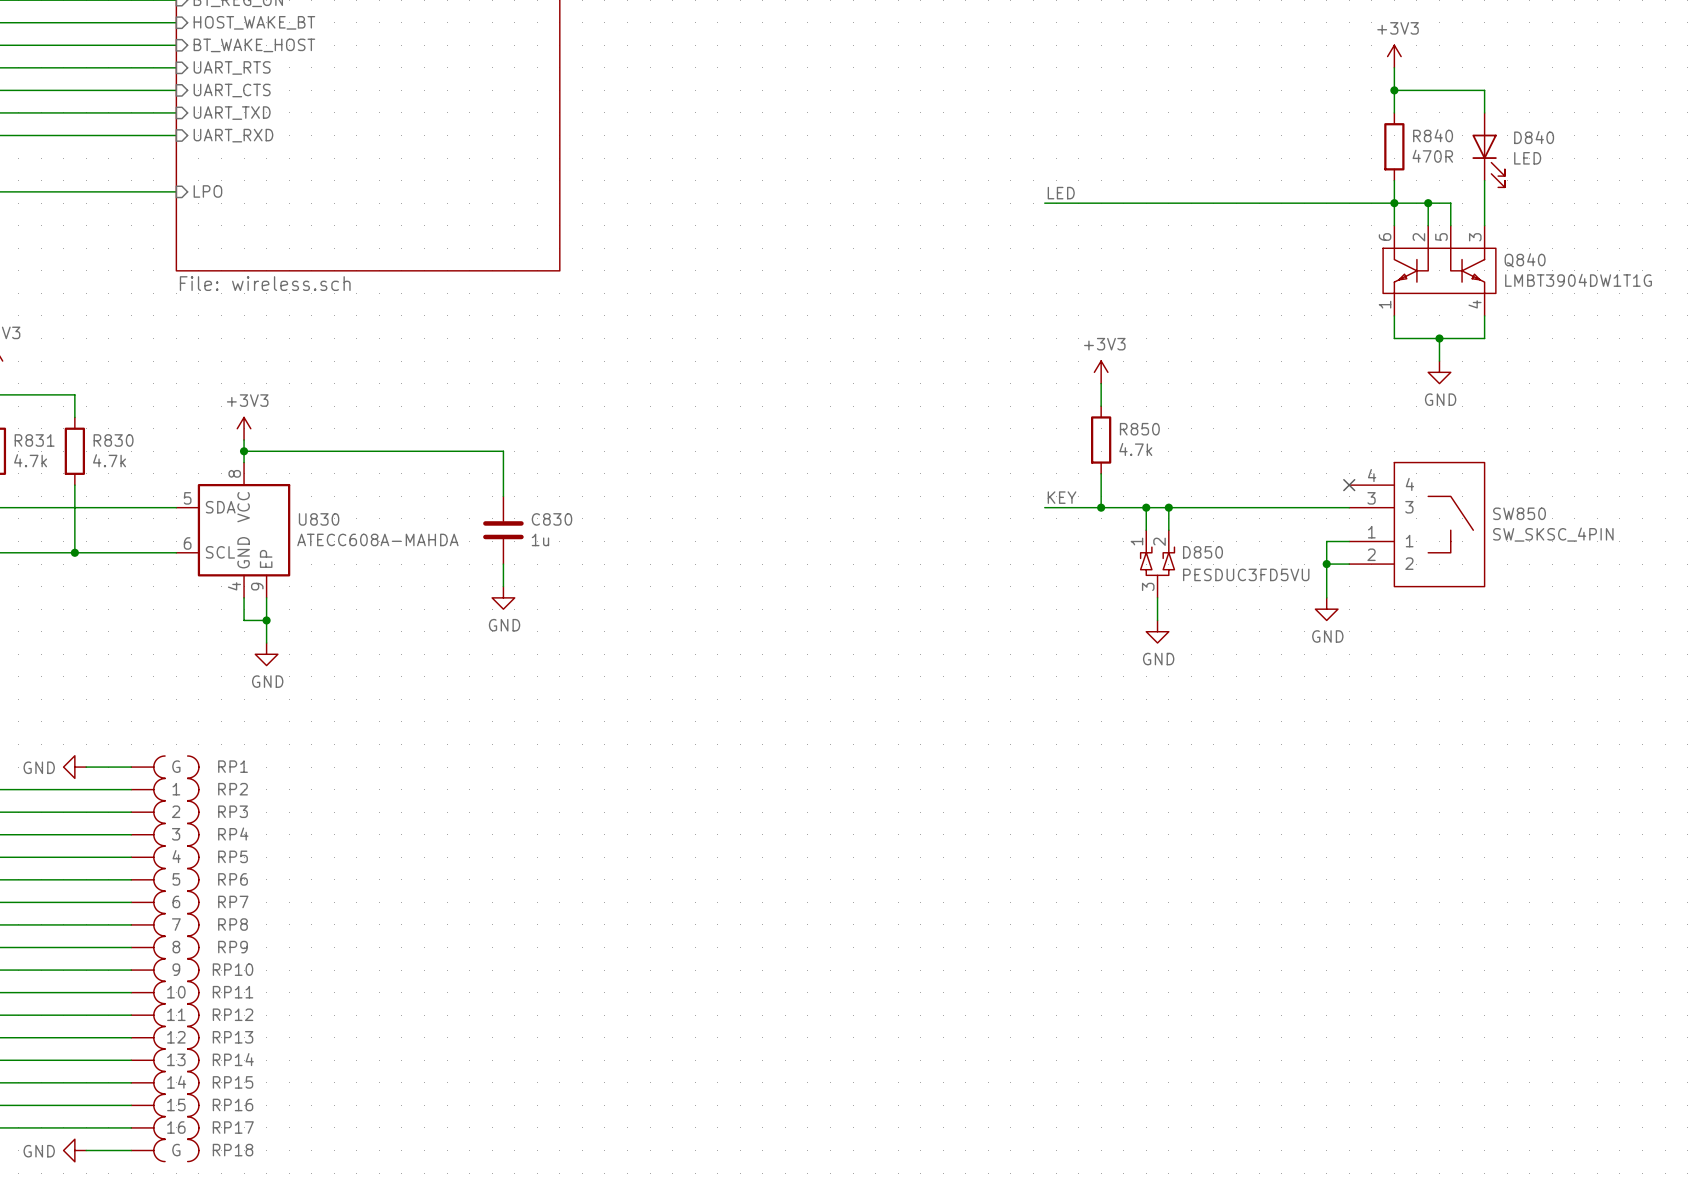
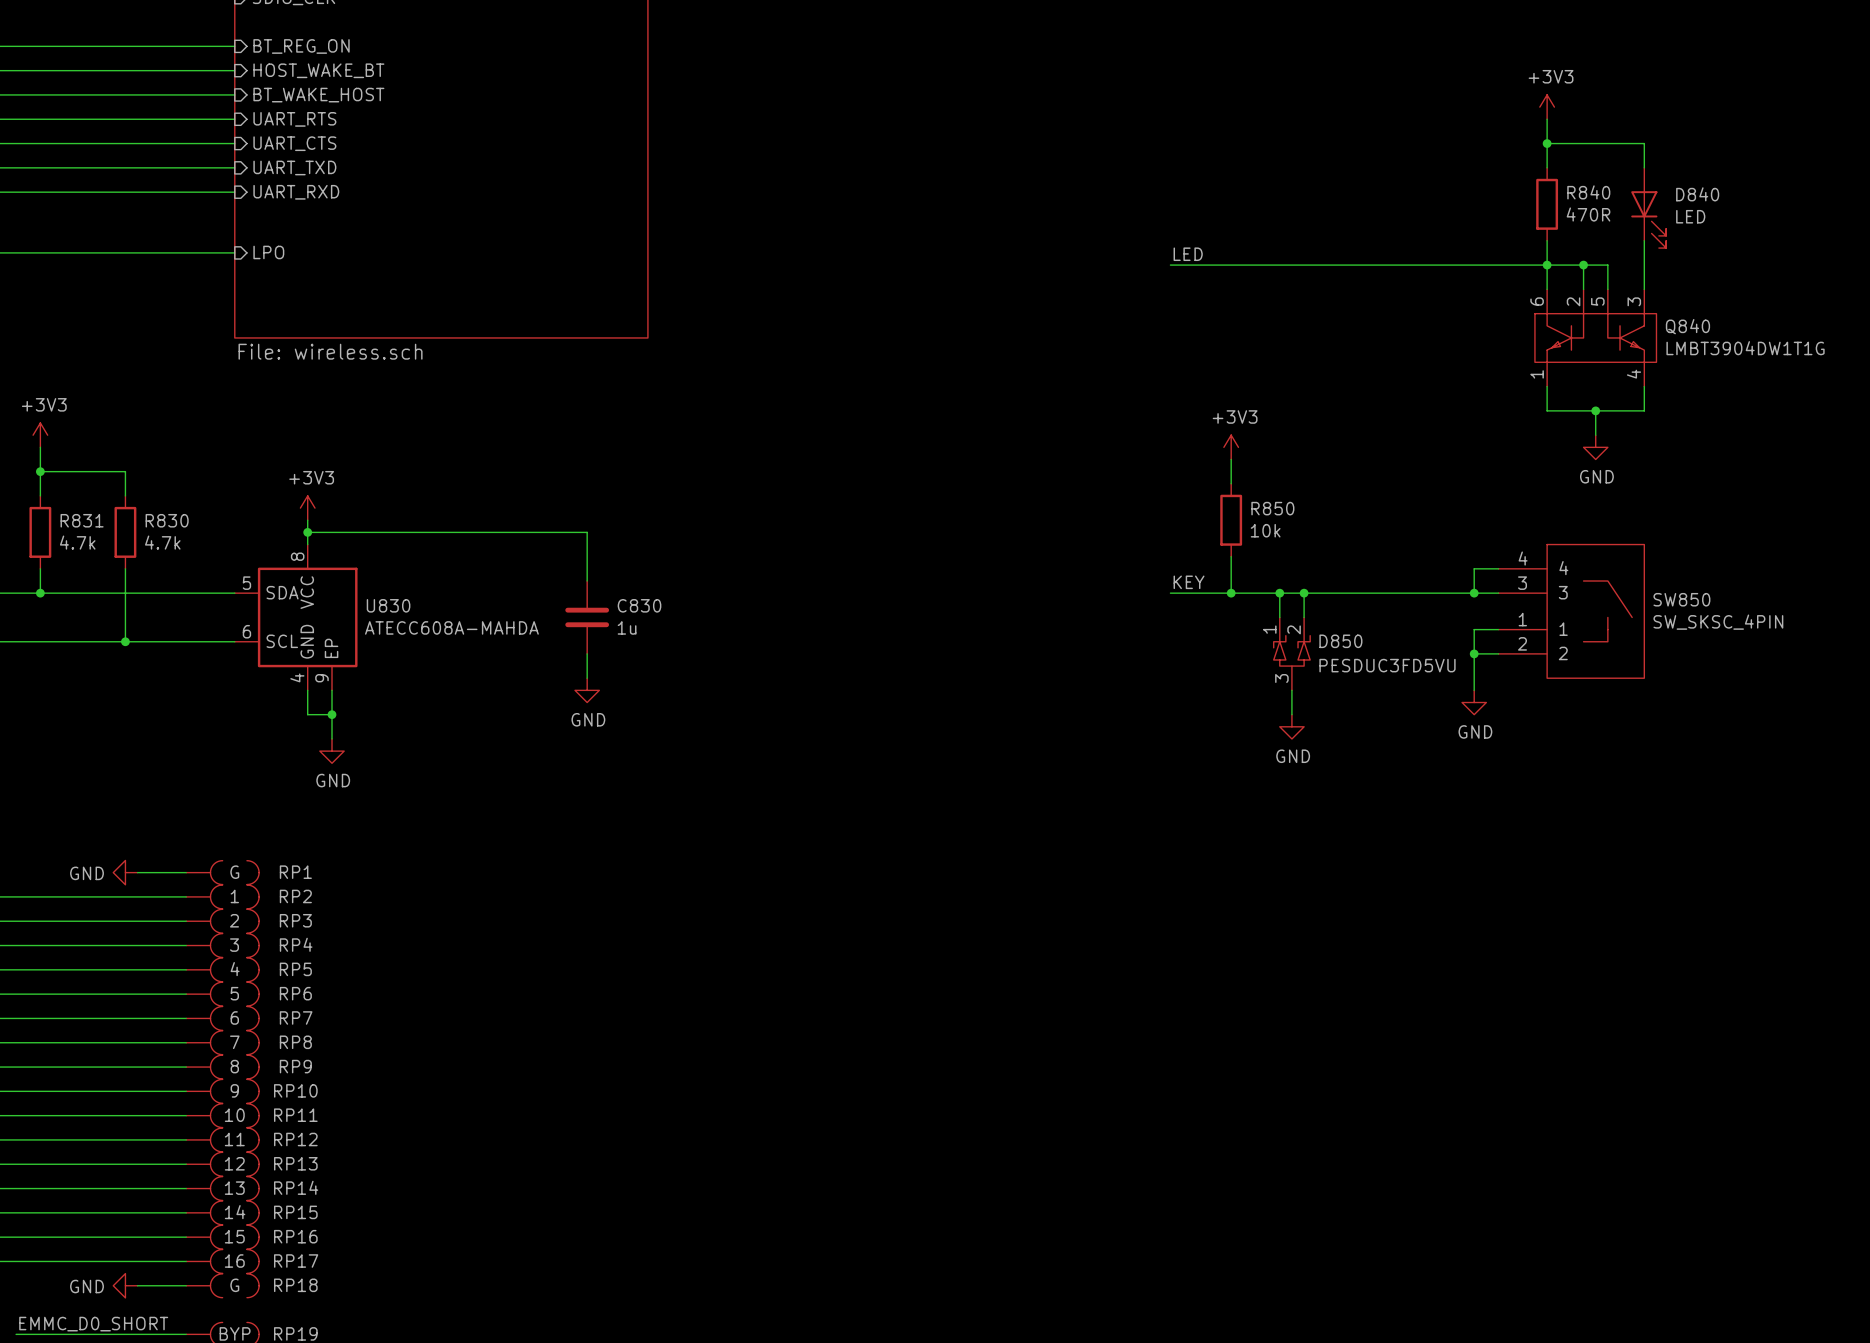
R850 value: 4.7k (1135, 449) -> 10k (1265, 530)
wire: none -> (1498, 568) (1474, 568) (1474, 593)
no-connect mark: (1349, 485) -> none
junction: none -> (1474, 593)

